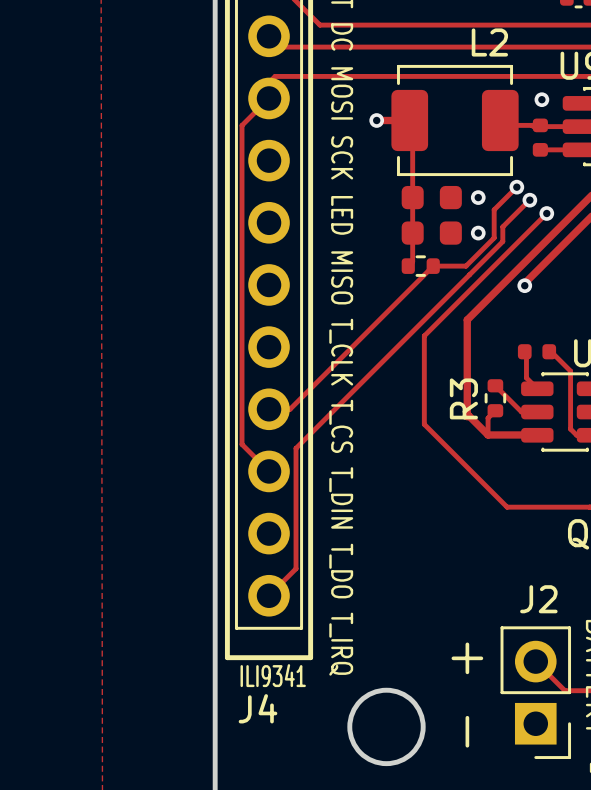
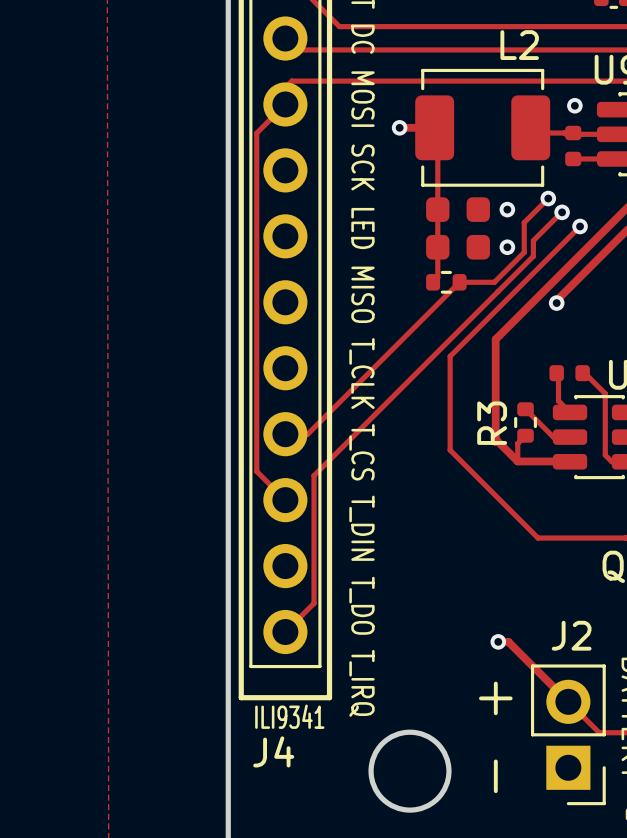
track: none -> (498, 641) (508, 641) (568, 701)
via: none -> (498, 641)

